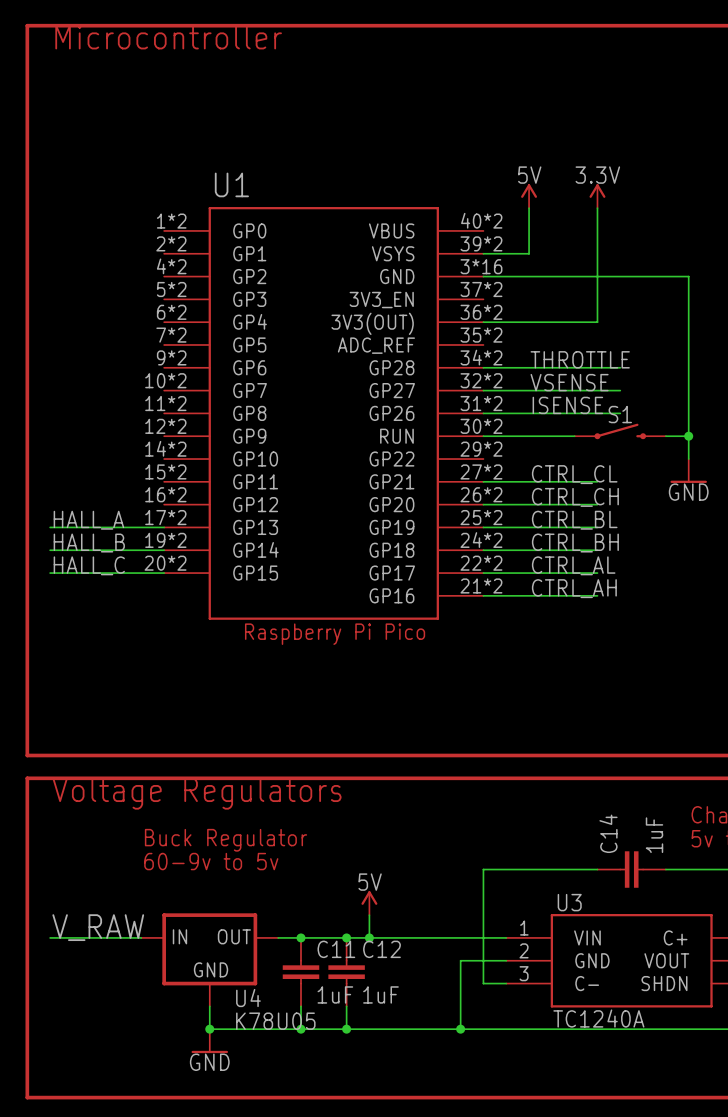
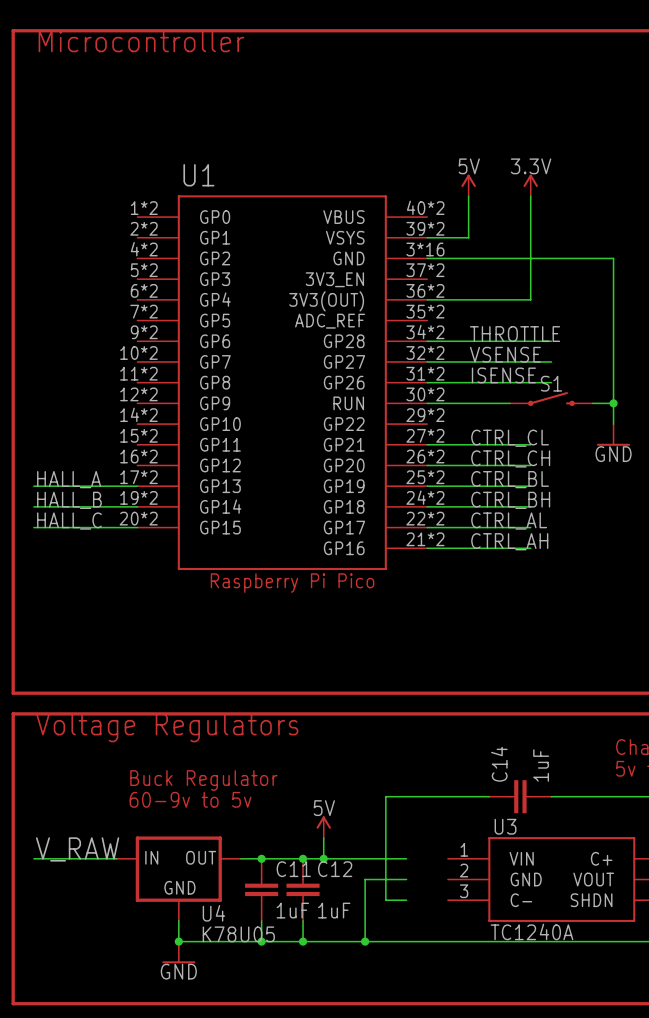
text position: Buck Regulator (226, 840) -> Buck Regulator (203, 780)
text position: 60-9v to 5v (211, 861) -> 60-9v to 5v (190, 799)
wire: (483, 869) (483, 983) (506, 983) -> (427, 796) (385, 796) (385, 900) (406, 900)
C14 position: (631, 869) -> (520, 796)
wire: (460, 937) (506, 937) -> none
wire: (506, 960) (460, 960) (460, 1029) -> (406, 879) (365, 879) (365, 941)
junction position: (460, 1029) -> (365, 941)

